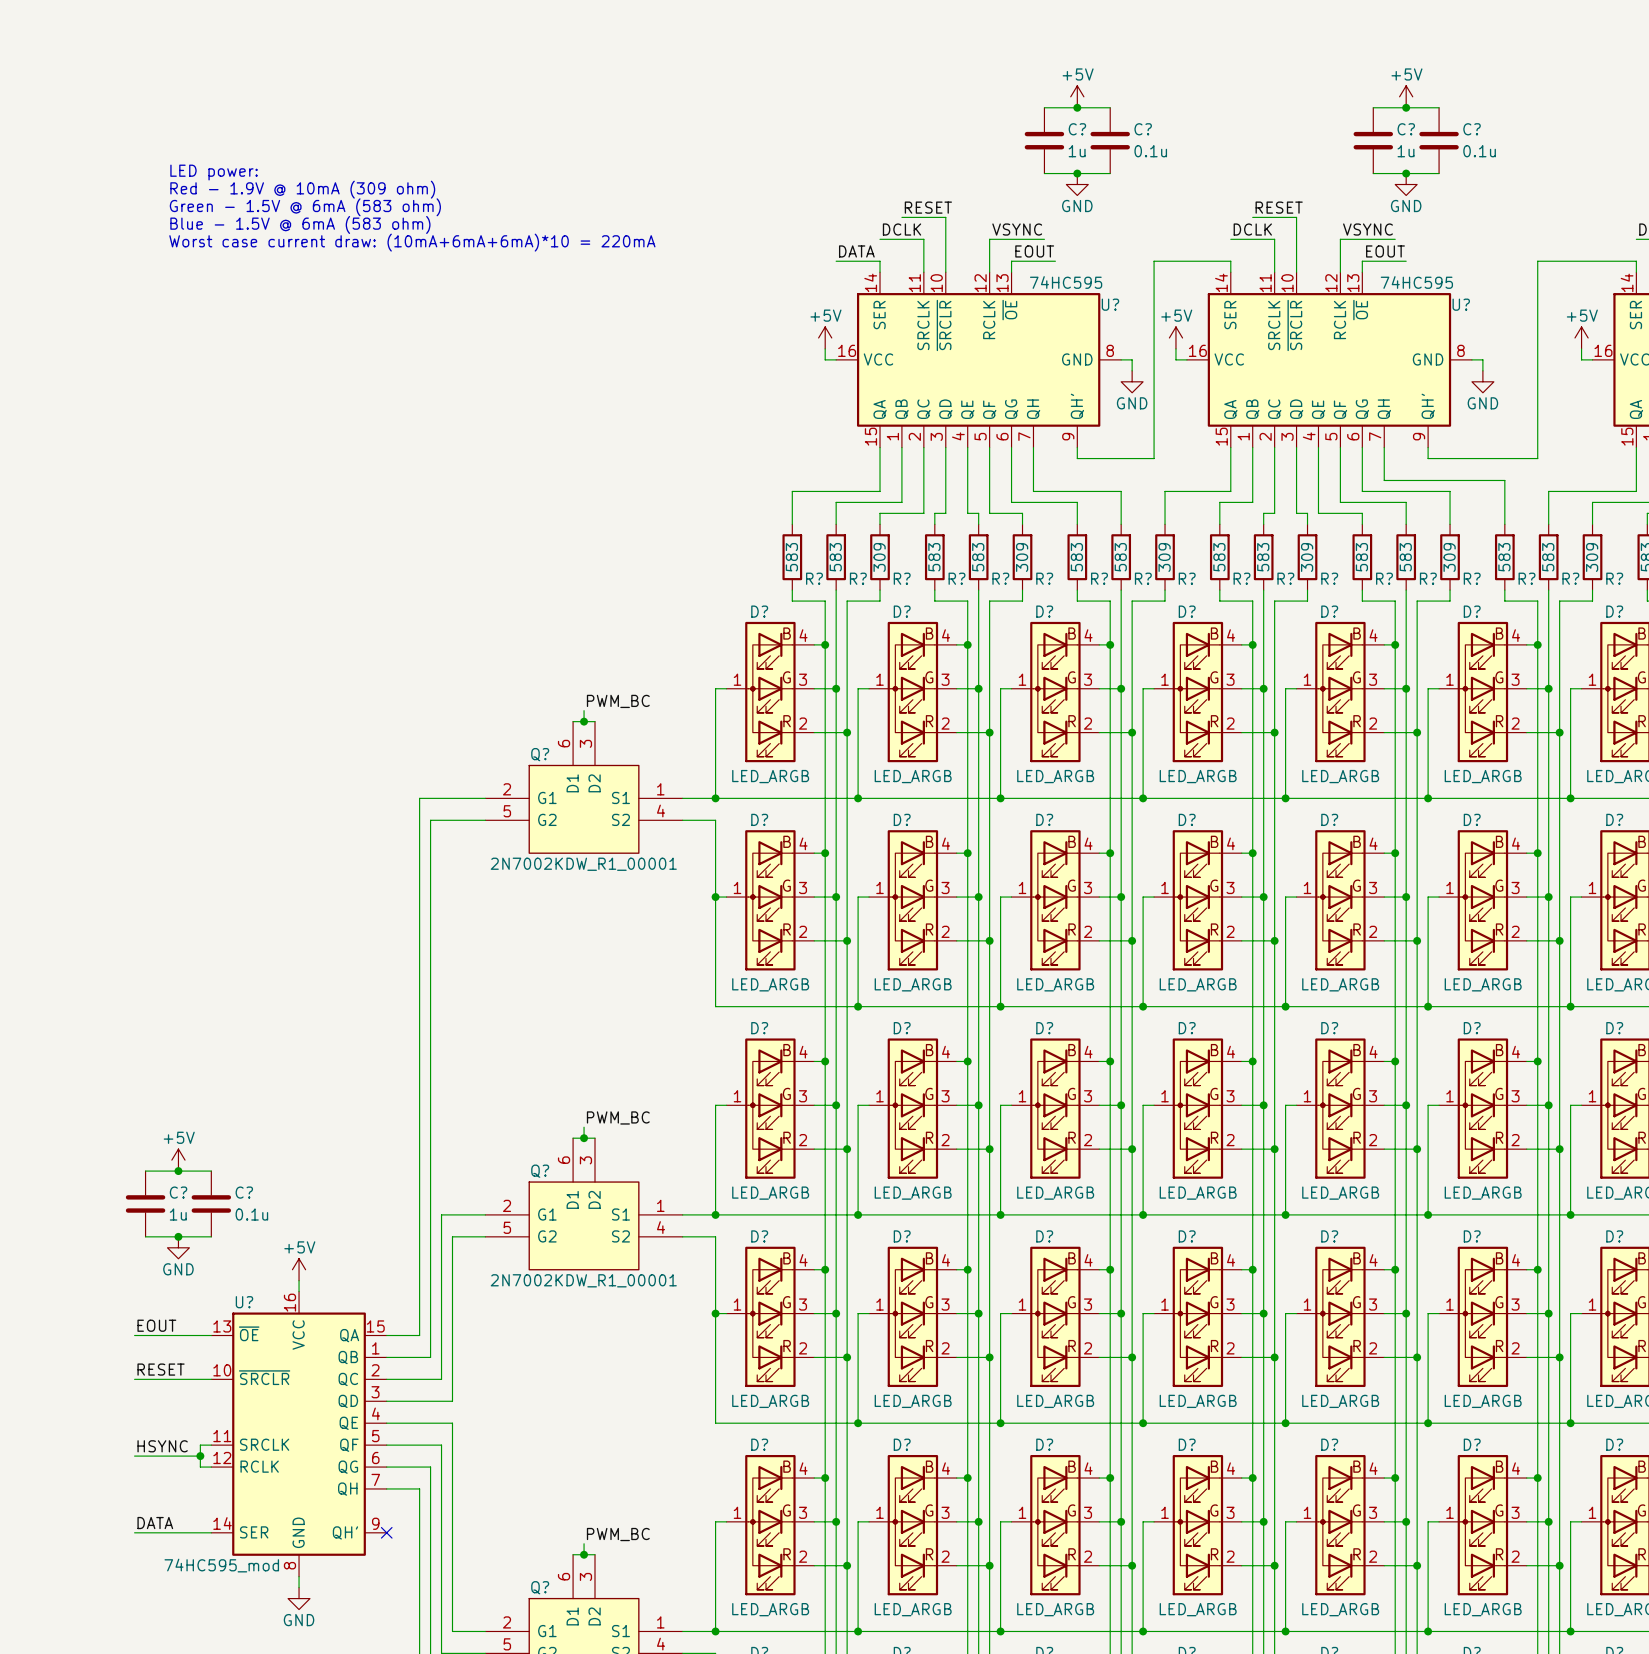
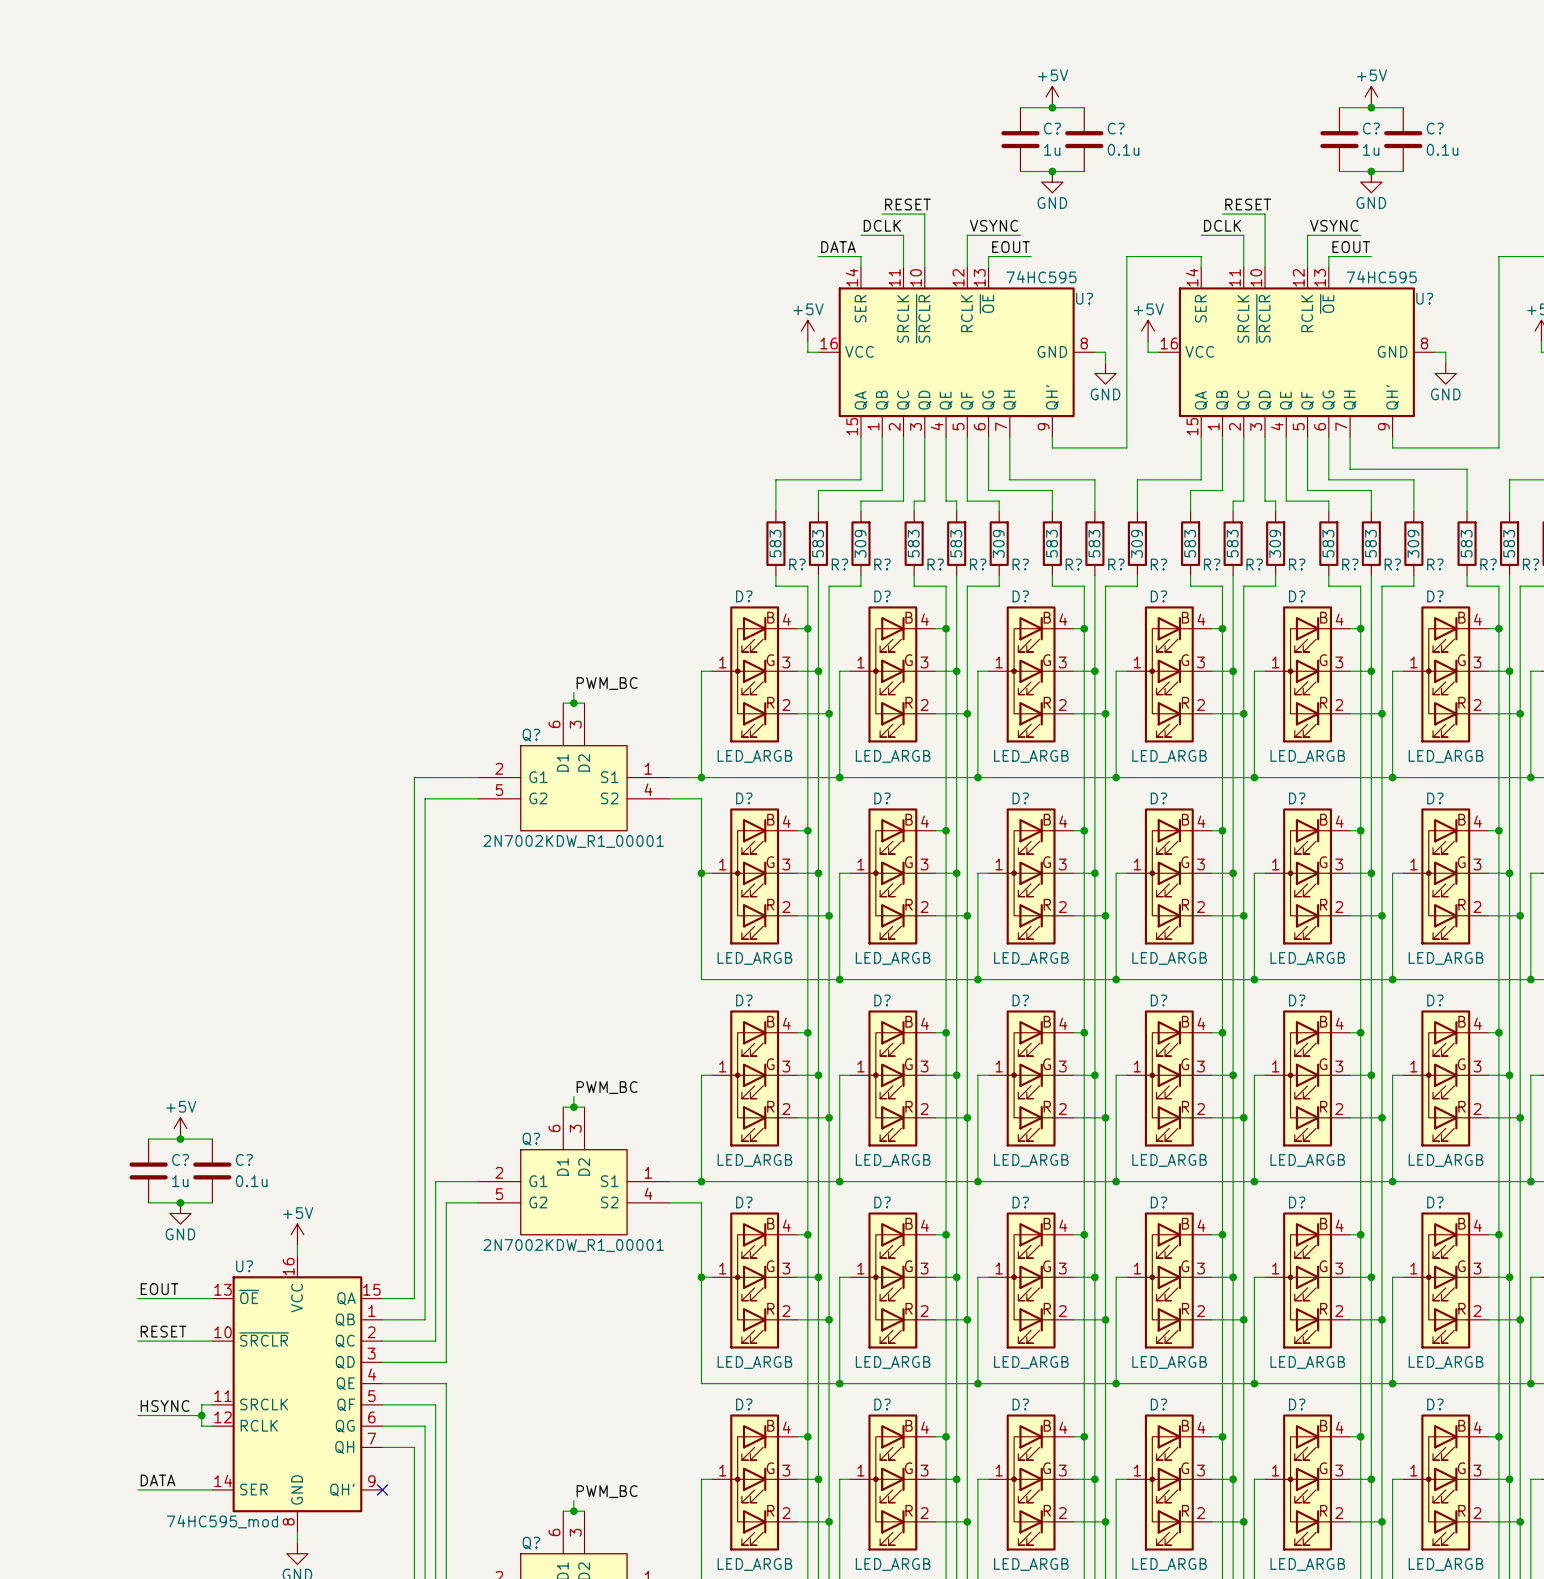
text: LED power: (214, 172) -> none
text: Red - 1.9V @ 10mA (309 ohm) (302, 189) -> none
text: Green - 1.5V @ 6mA (583 ohm) (305, 207) -> none
text: Blue - 1.5V @ 6mA (583 ohm) (300, 224) -> none
text: Worst case current draw: (10mA+6mA+6mA)*10 = 220mA (412, 242) -> none

